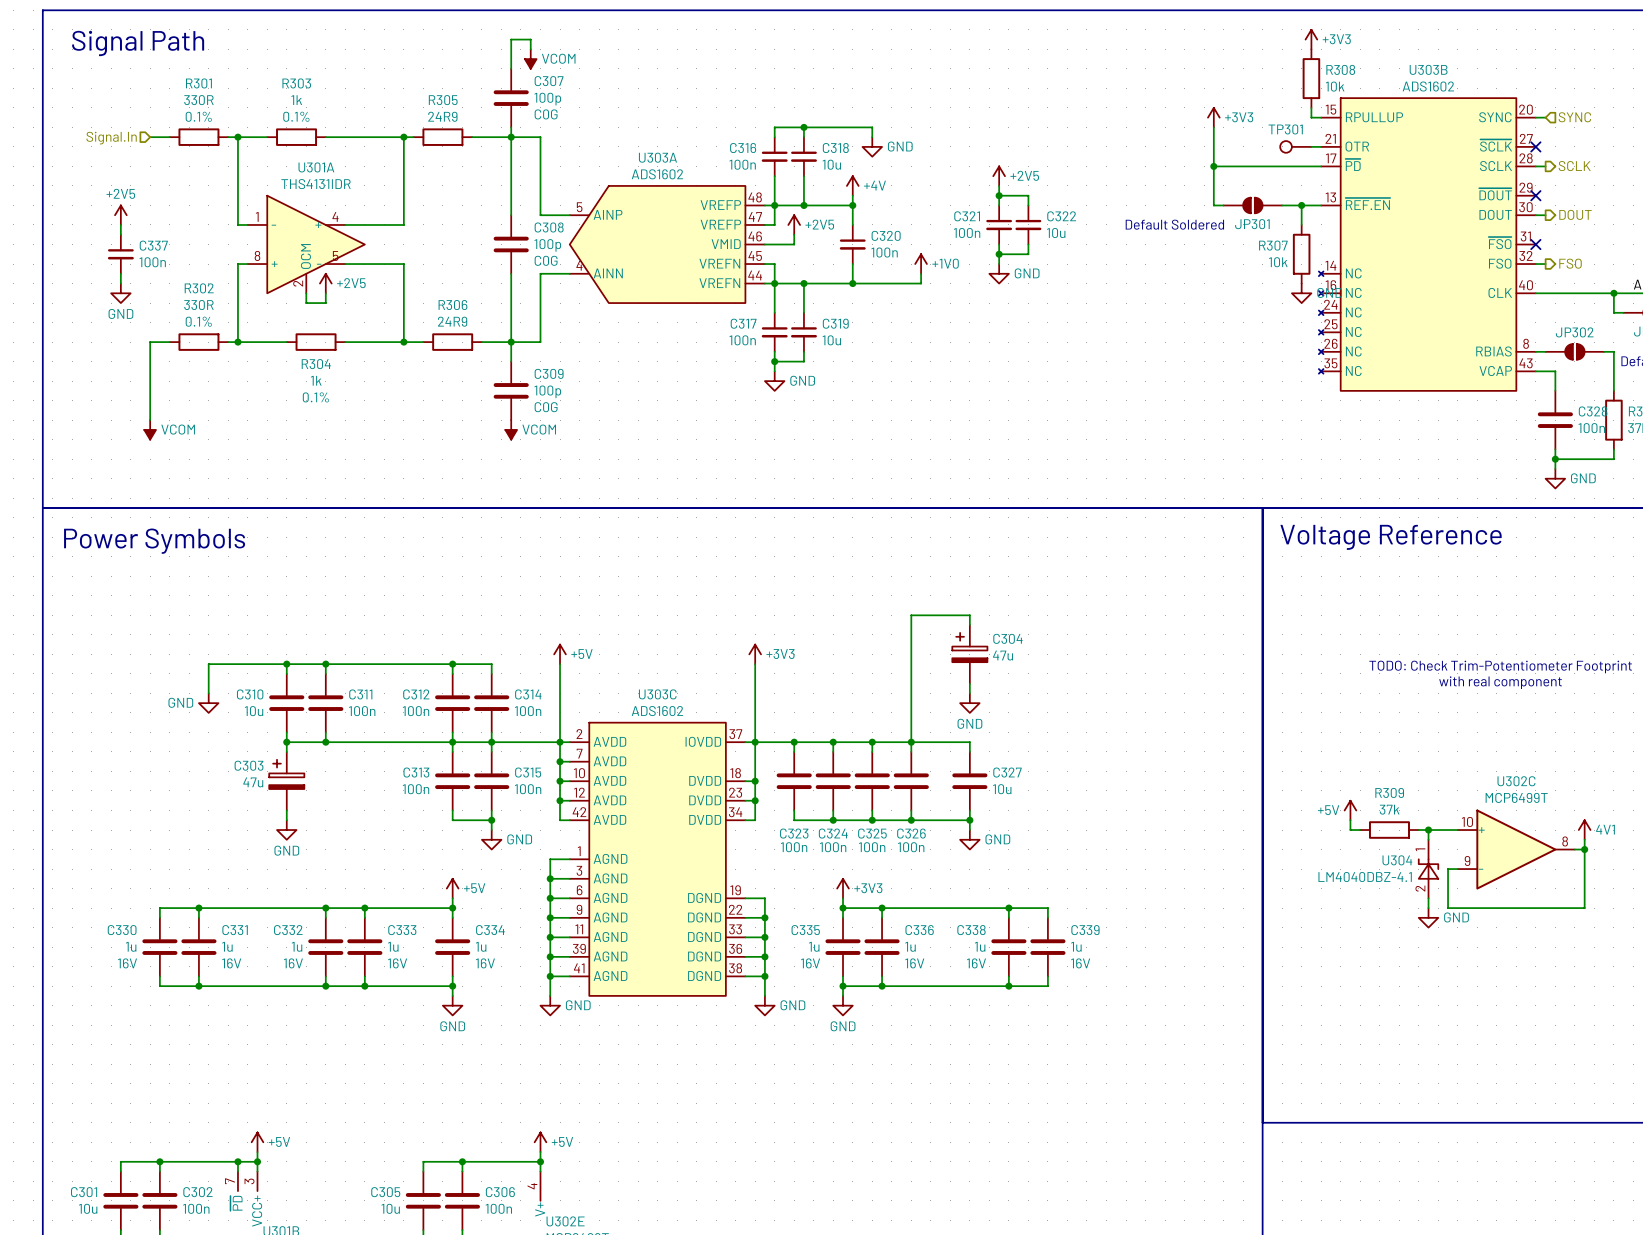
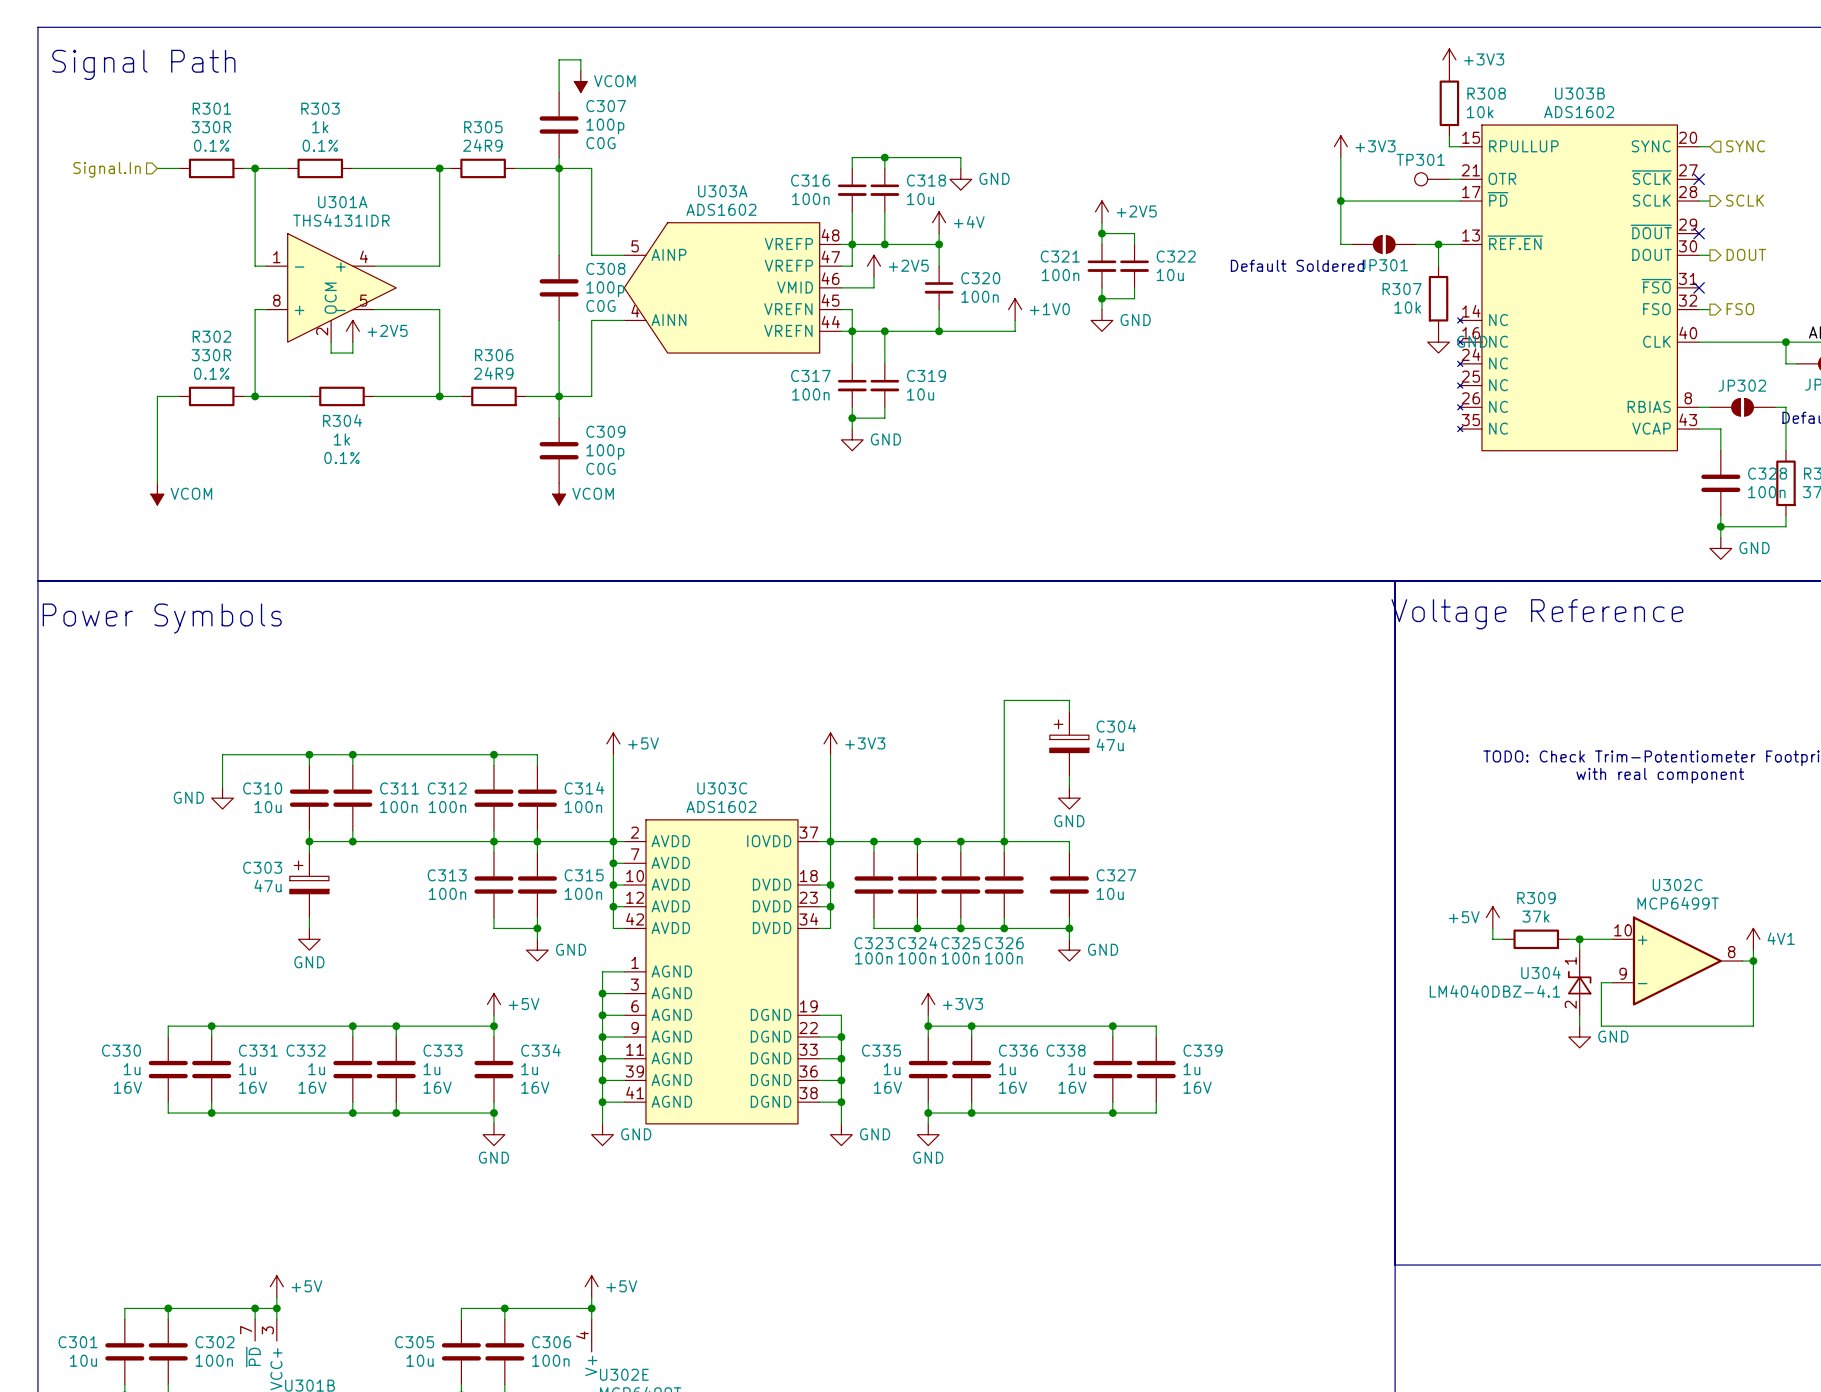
power symbol: +2V5 (120, 215) -> none
wire: (120, 224) (120, 234) -> none
C337: 100n (120, 254) -> none
wire: (120, 273) (120, 283) -> none
power symbol: GND (120, 293) -> none

